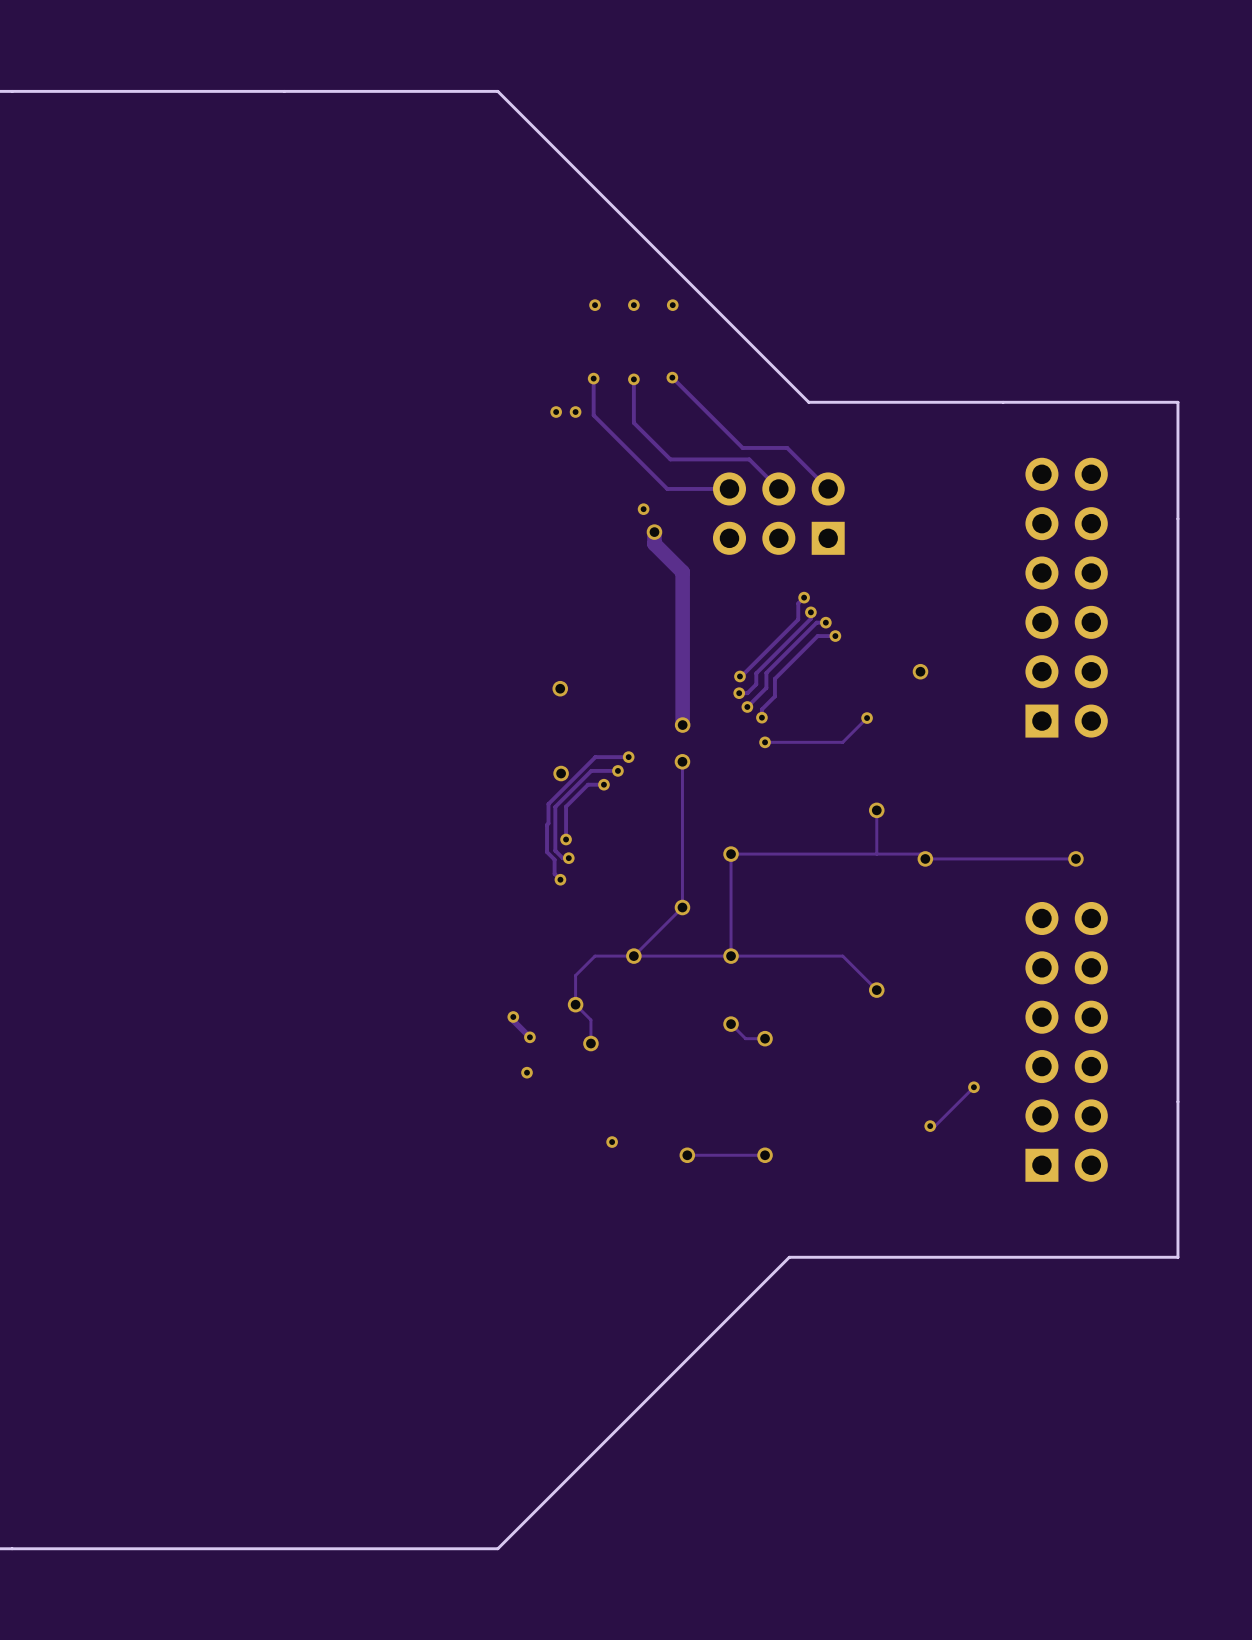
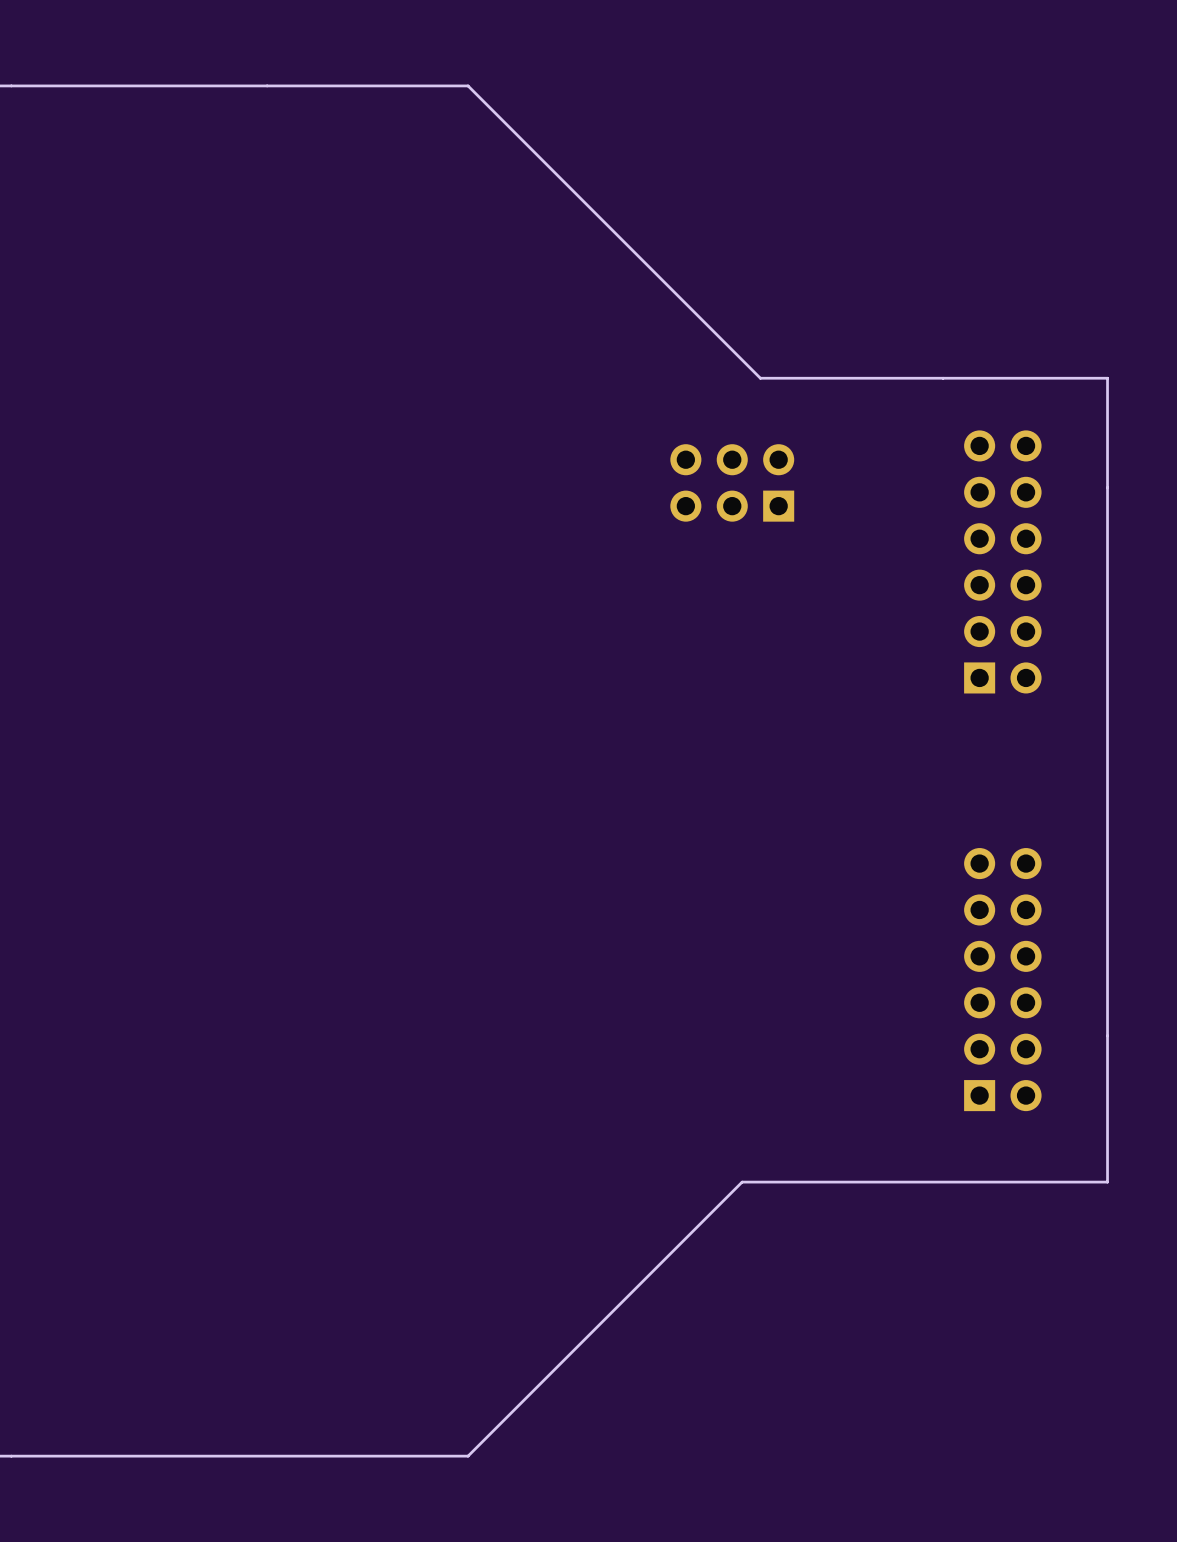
via: (595, 305) -> none
via: (633, 305) -> none
via: (672, 305) -> none
track: (672, 377) (742, 447) (787, 447) (828, 488) -> none
via: (672, 377) -> none
track: (593, 378) (593, 415) (667, 488) (729, 488) -> none
via: (593, 378) -> none
track: (633, 379) (633, 422) (670, 459) (749, 459) (778, 488) -> none
via: (633, 379) -> none
via: (556, 412) -> none
via: (575, 412) -> none
via: (643, 509) -> none
track: (654, 532) (654, 543) (682, 572) (682, 725) -> none
via: (654, 532) -> none
track: (804, 597) (798, 603) (798, 619) (739, 676) -> none
via: (804, 597) -> none
track: (810, 612) (810, 618) (756, 673) (756, 684) (747, 693) (739, 693) -> none
via: (810, 612) -> none
track: (825, 622) (816, 622) (766, 672) (766, 687) (747, 706) -> none
via: (825, 622) -> none
track: (835, 636) (817, 636) (774, 678) (774, 696) (761, 709) (761, 717) -> none
via: (835, 636) -> none
via: (920, 671) -> none
via: (739, 676) -> none
via: (560, 688) -> none
via: (739, 693) -> none
via: (747, 706) -> none
via: (761, 717) -> none
track: (867, 718) (842, 742) (765, 742) -> none
via: (867, 718) -> none
via: (682, 725) -> none
via: (765, 742) -> none
track: (628, 757) (595, 757) (548, 804) (547, 852) (554, 859) (554, 873) (560, 879) -> none
via: (628, 757) -> none
track: (682, 761) (682, 907) (633, 956) -> none
via: (682, 761) -> none
track: (617, 770) (591, 770) (555, 806) (555, 850) (562, 858) (568, 858) -> none
via: (617, 770) -> none
via: (561, 773) -> none
track: (603, 784) (588, 784) (566, 806) (566, 839) -> none
via: (603, 784) -> none
track: (876, 810) (876, 854) -> none
via: (876, 810) -> none
via: (566, 839) -> none
via: (731, 854) -> none
via: (568, 858) -> none
via: (925, 858) -> none
track: (1075, 858) (925, 858) (920, 854) (731, 854) (731, 956) -> none
via: (1075, 858) -> none
via: (560, 879) -> none
via: (682, 907) -> none
via: (633, 956) -> none
via: (731, 956) -> none
track: (876, 990) (842, 956) (595, 956) (575, 975) (575, 1004) (590, 1020) (590, 1043) -> none
via: (876, 990) -> none
via: (575, 1004) -> none
track: (513, 1016) (513, 1020) (529, 1037) -> none
via: (513, 1016) -> none
track: (731, 1024) (745, 1038) (765, 1038) -> none
via: (731, 1024) -> none
via: (529, 1037) -> none
via: (765, 1038) -> none
via: (590, 1043) -> none
via: (527, 1072) -> none
track: (973, 1087) (935, 1126) (930, 1126) -> none
via: (973, 1087) -> none
via: (930, 1126) -> none
via: (612, 1142) -> none
via: (687, 1155) -> none
track: (765, 1155) (687, 1155) -> none
via: (765, 1155) -> none

